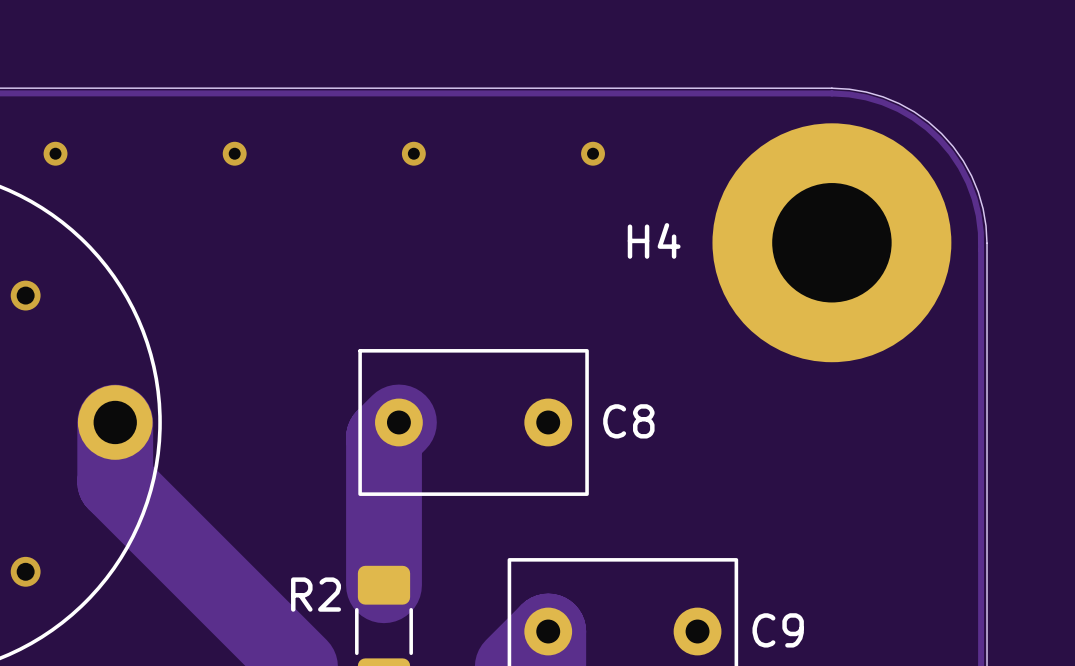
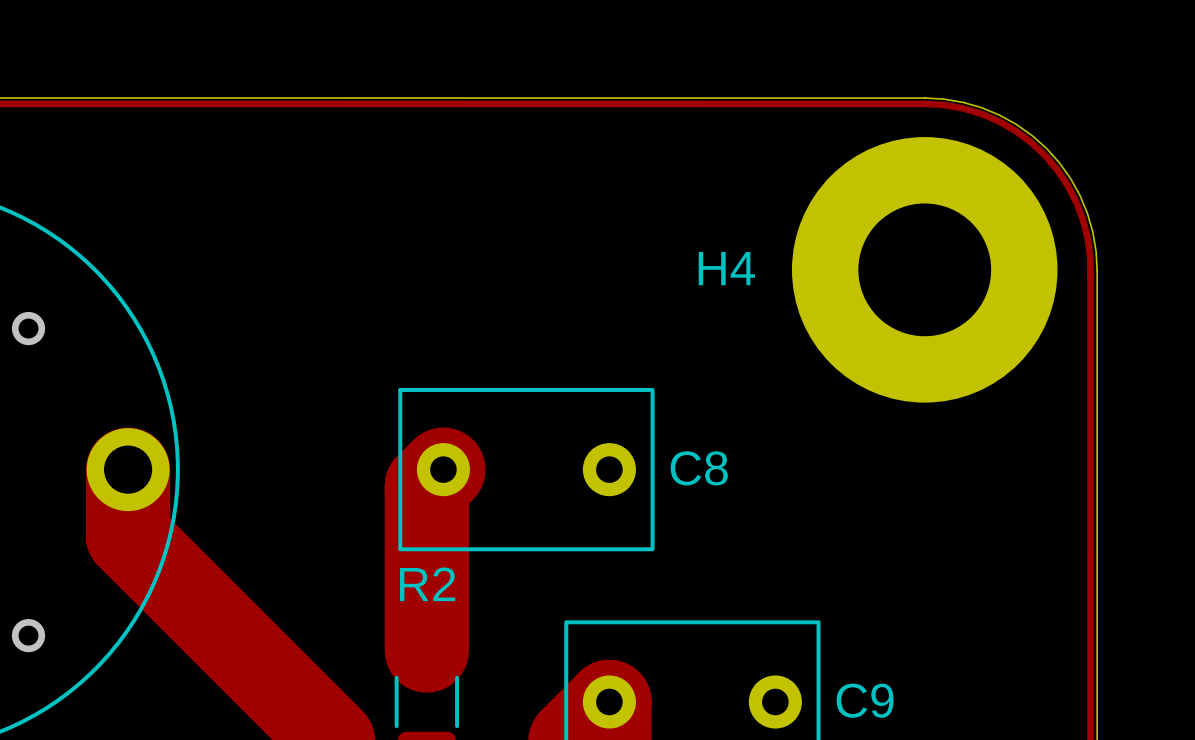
via: (55, 153) -> none
via: (234, 153) -> none
via: (413, 153) -> none
via: (593, 153) -> none
R2 name position: R2 (316, 594) -> R2 (427, 584)

